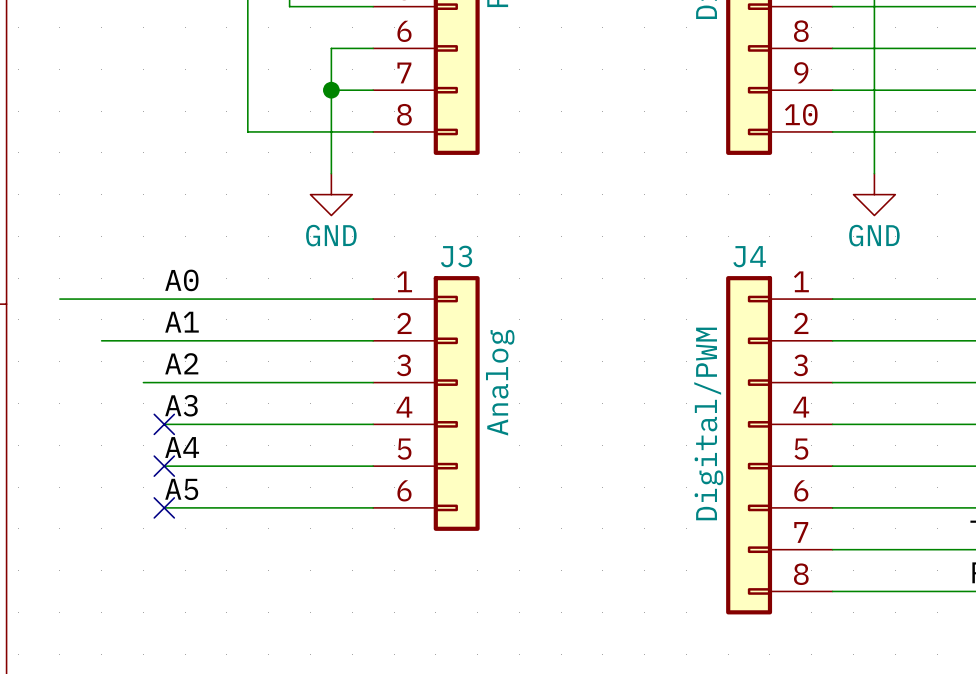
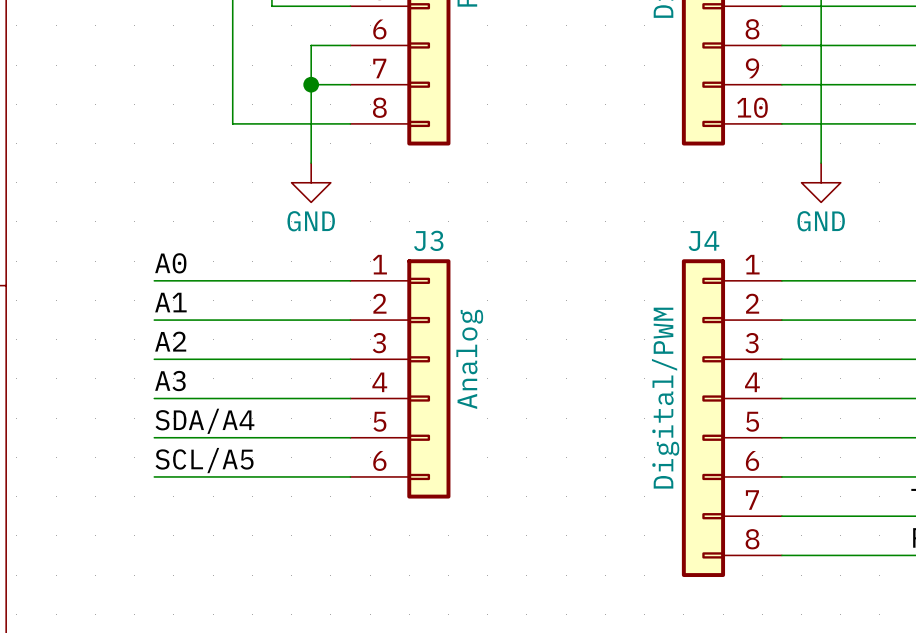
wire: (59, 299) (164, 299) -> none
wire: (101, 340) (164, 340) -> none
wire: (143, 382) (164, 382) -> none
no-connect mark: (164, 424) -> none
label: A4 (182, 447) -> SDA/A4 (204, 421)
no-connect mark: (164, 466) -> none
label: A5 (181, 489) -> SCL/A5 (204, 460)
no-connect mark: (164, 507) -> none

